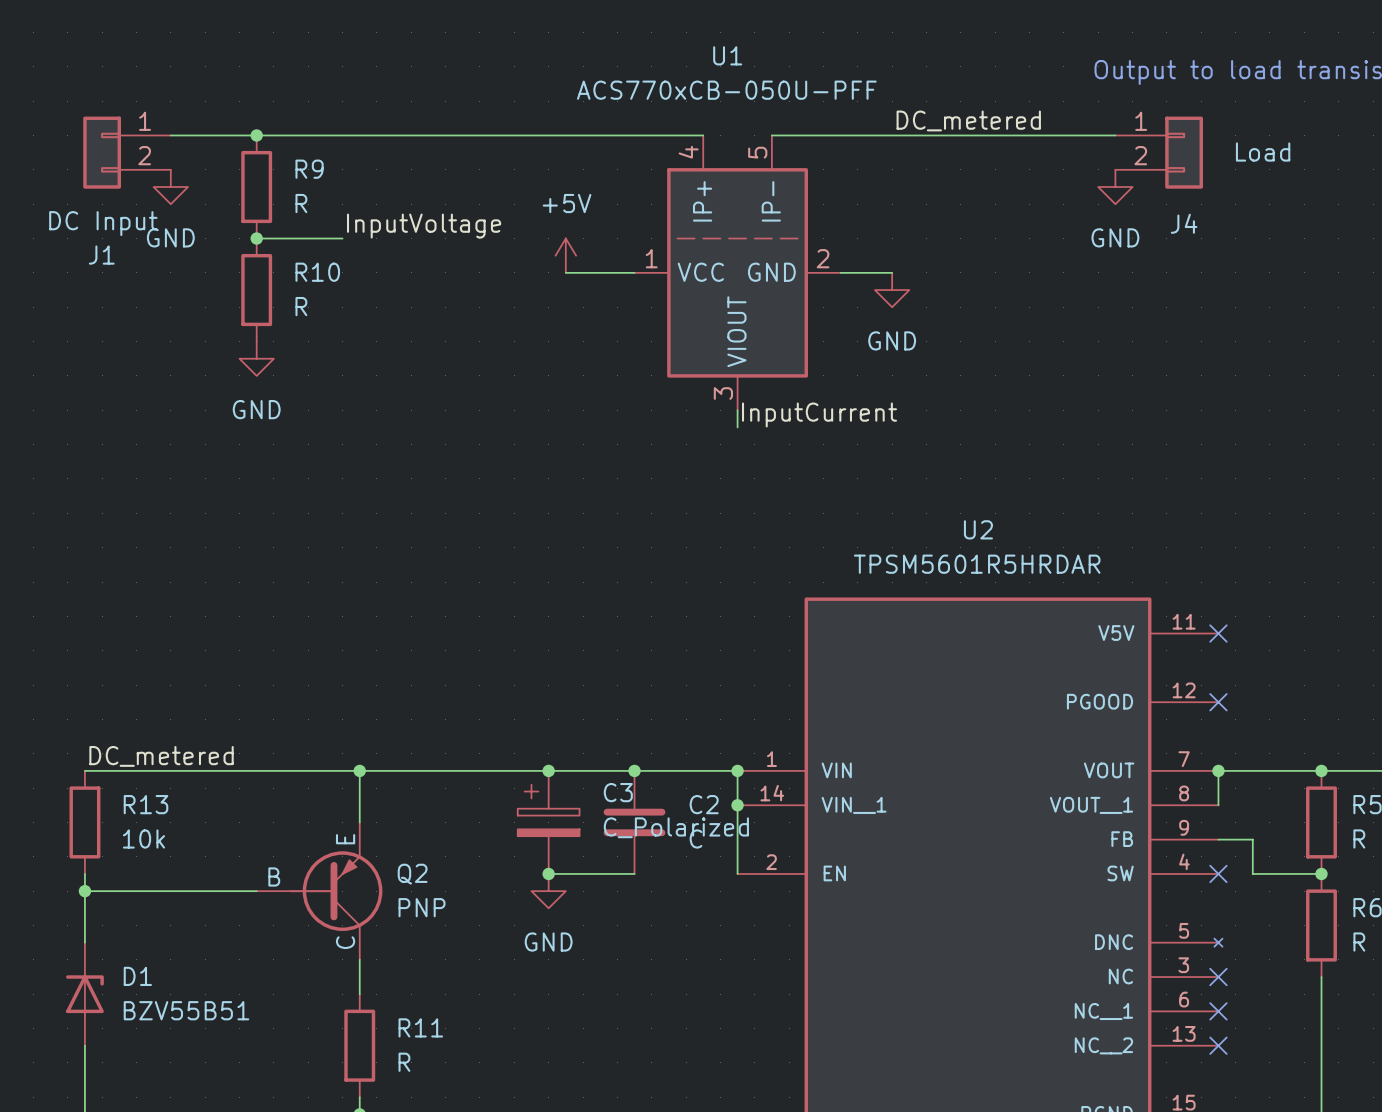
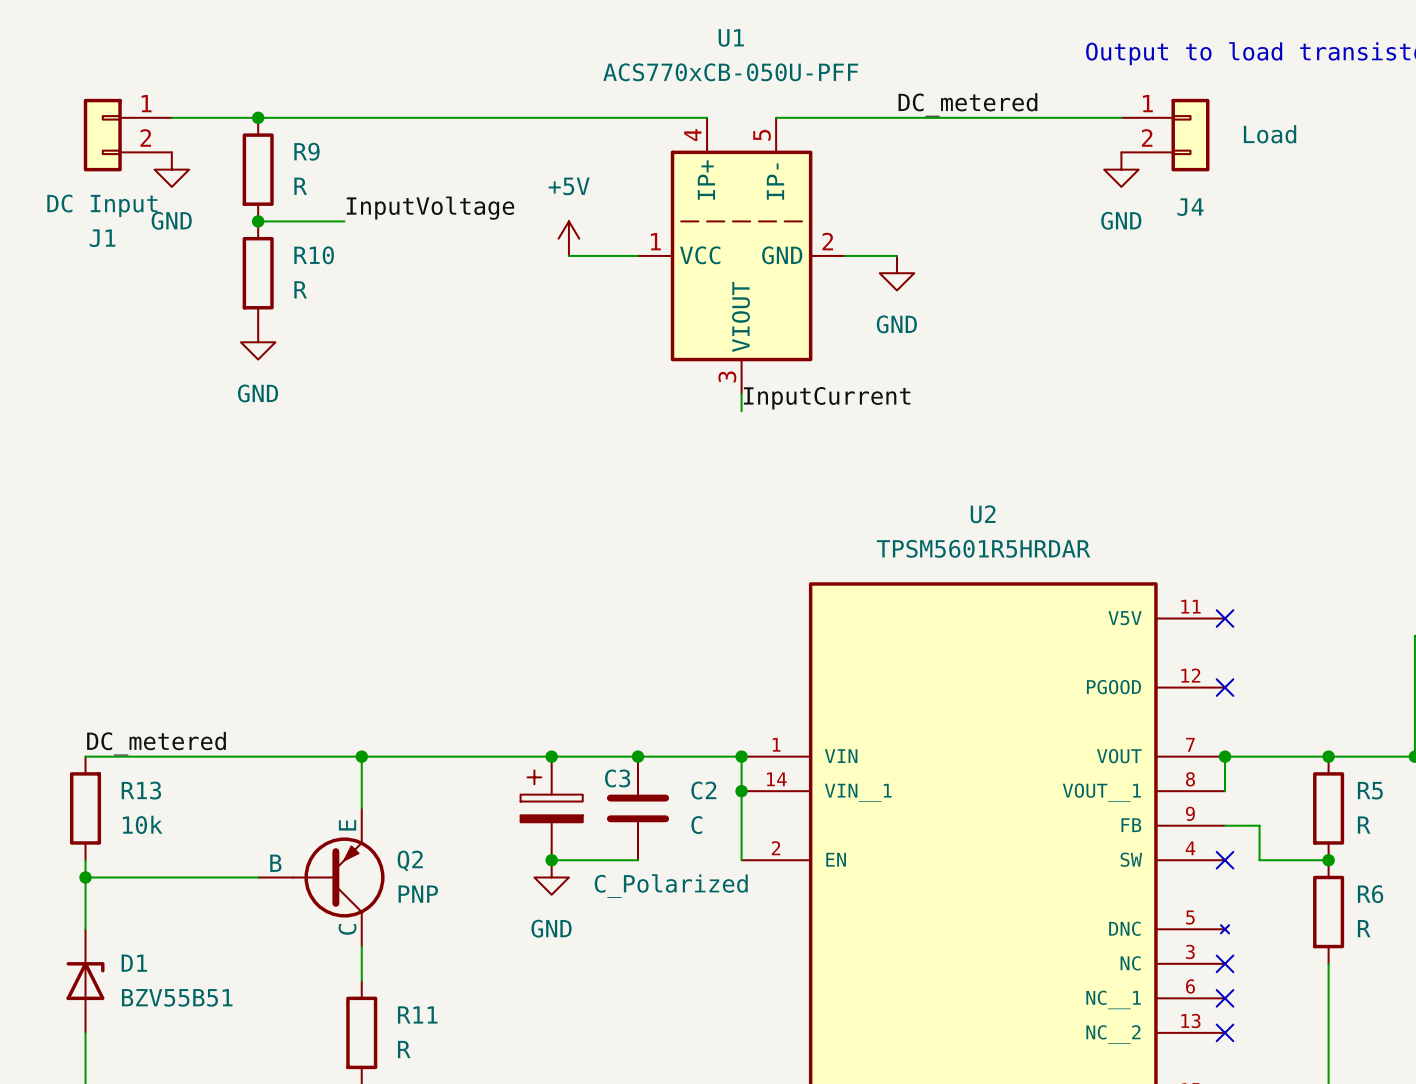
C3 value position: C_Polarized (676, 827) -> C_Polarized (671, 886)

